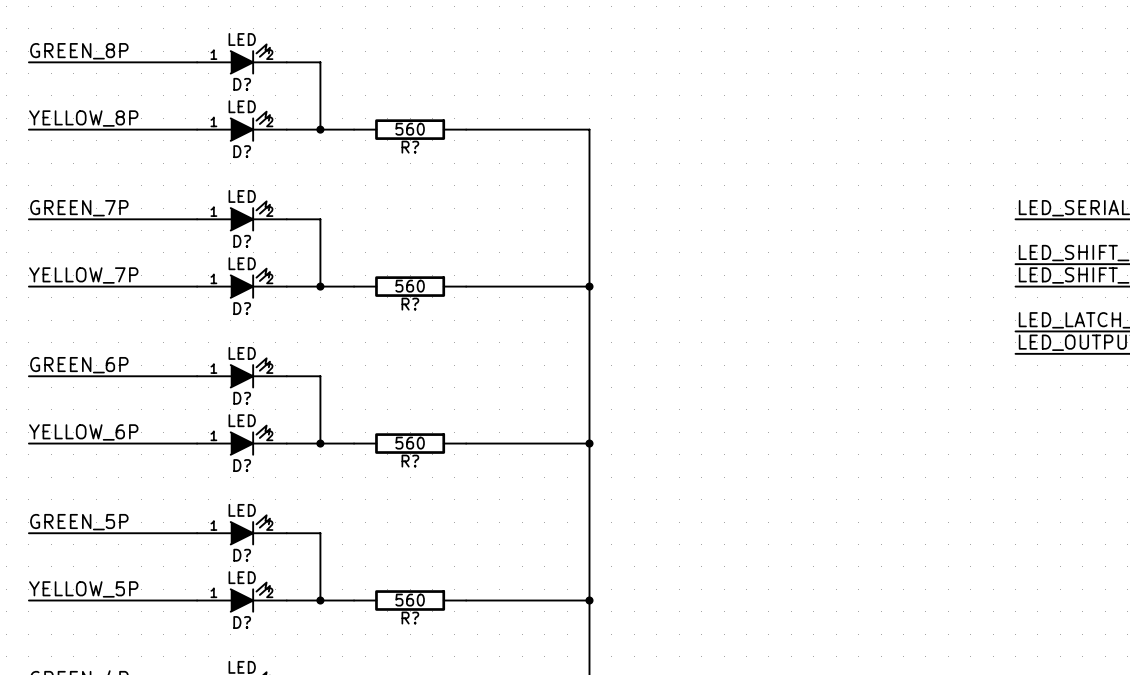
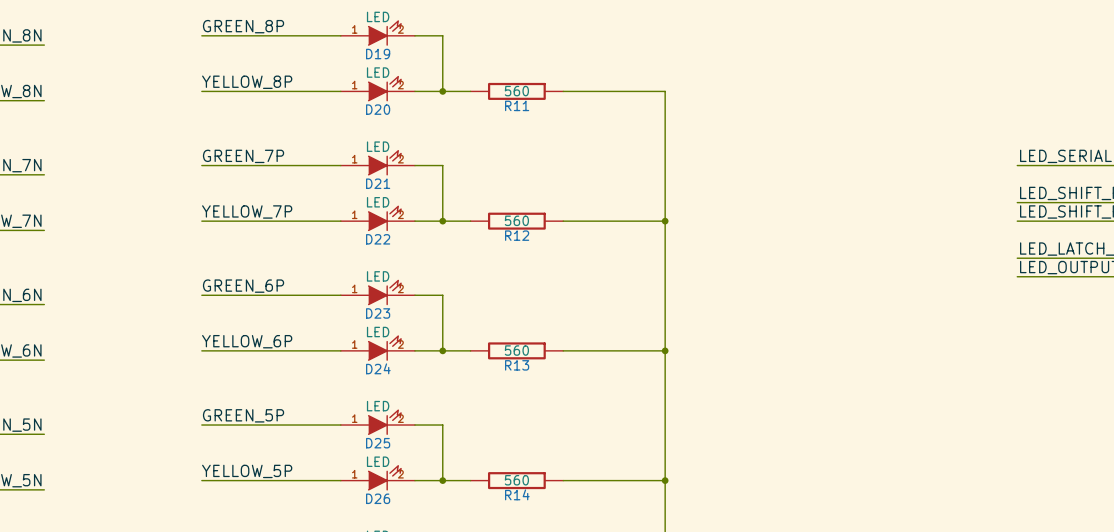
D? name: D? (242, 84) -> D19 (378, 54)
R? name: R? (410, 147) -> R11 (517, 105)
D? name: D? (242, 151) -> D20 (378, 109)
D? name: D? (242, 241) -> D21 (378, 183)
R? name: R? (410, 304) -> R12 (517, 235)
D? name: D? (242, 308) -> D22 (378, 239)
D? name: D? (242, 398) -> D23 (378, 313)
R? name: R? (410, 461) -> R13 (517, 365)
D? name: D? (242, 465) -> D24 (378, 368)
D? name: D? (242, 555) -> D25 (378, 443)
R? name: R? (410, 618) -> R14 (517, 494)
D? name: D? (242, 622) -> D26 (378, 498)

